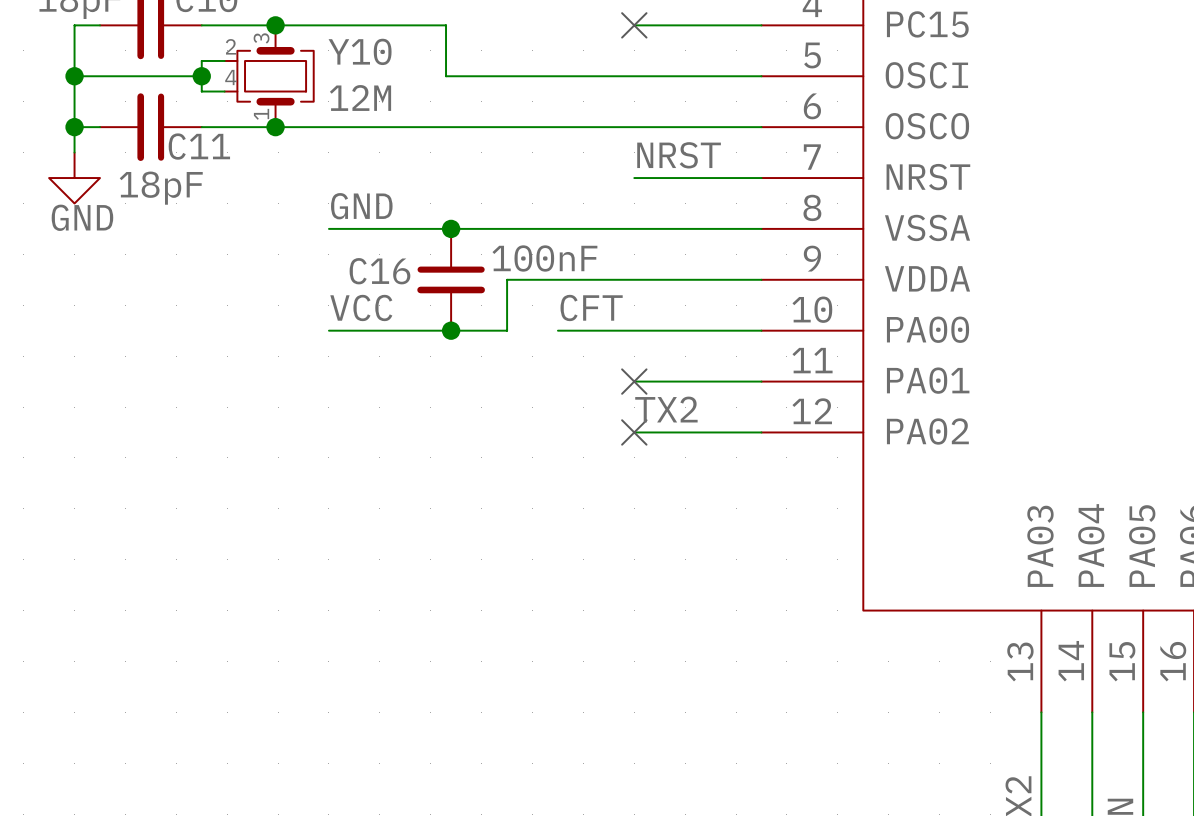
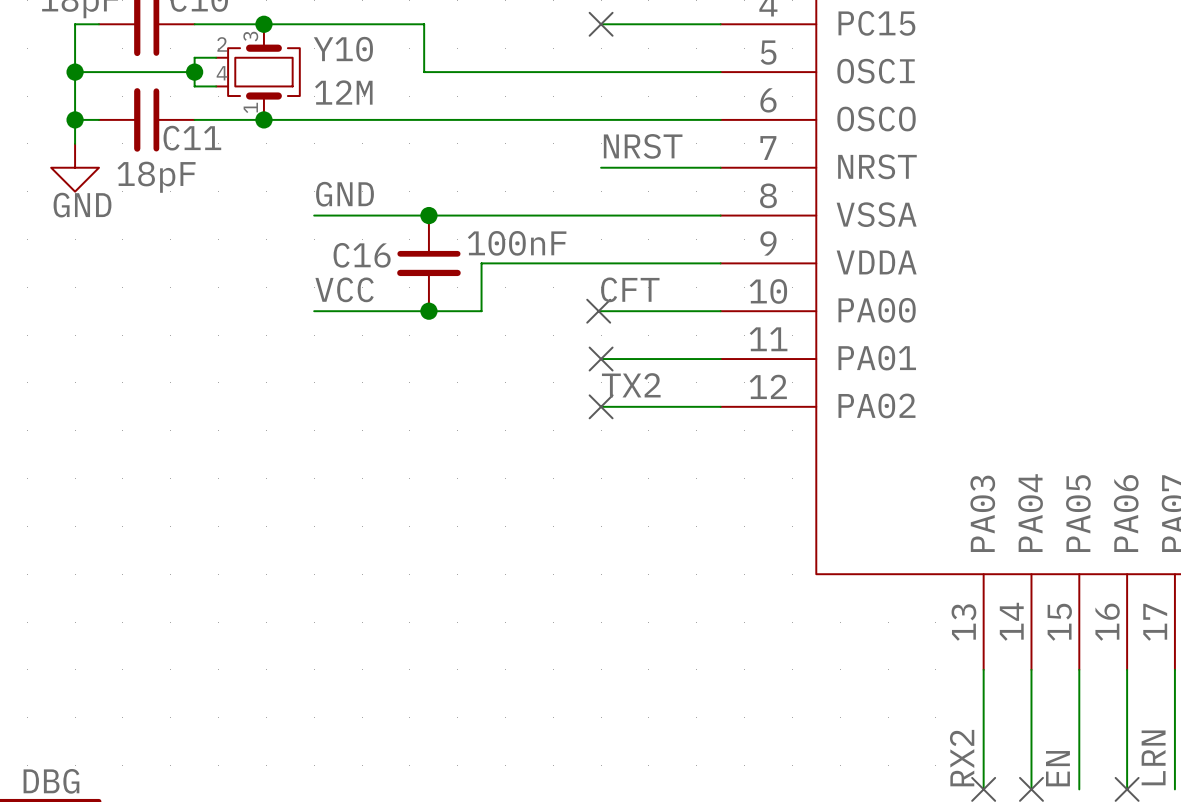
label position: CFT (591, 307) -> CFT (630, 289)
wire: (557, 330) (631, 330) -> none
no-connect mark: none -> (598, 311)

